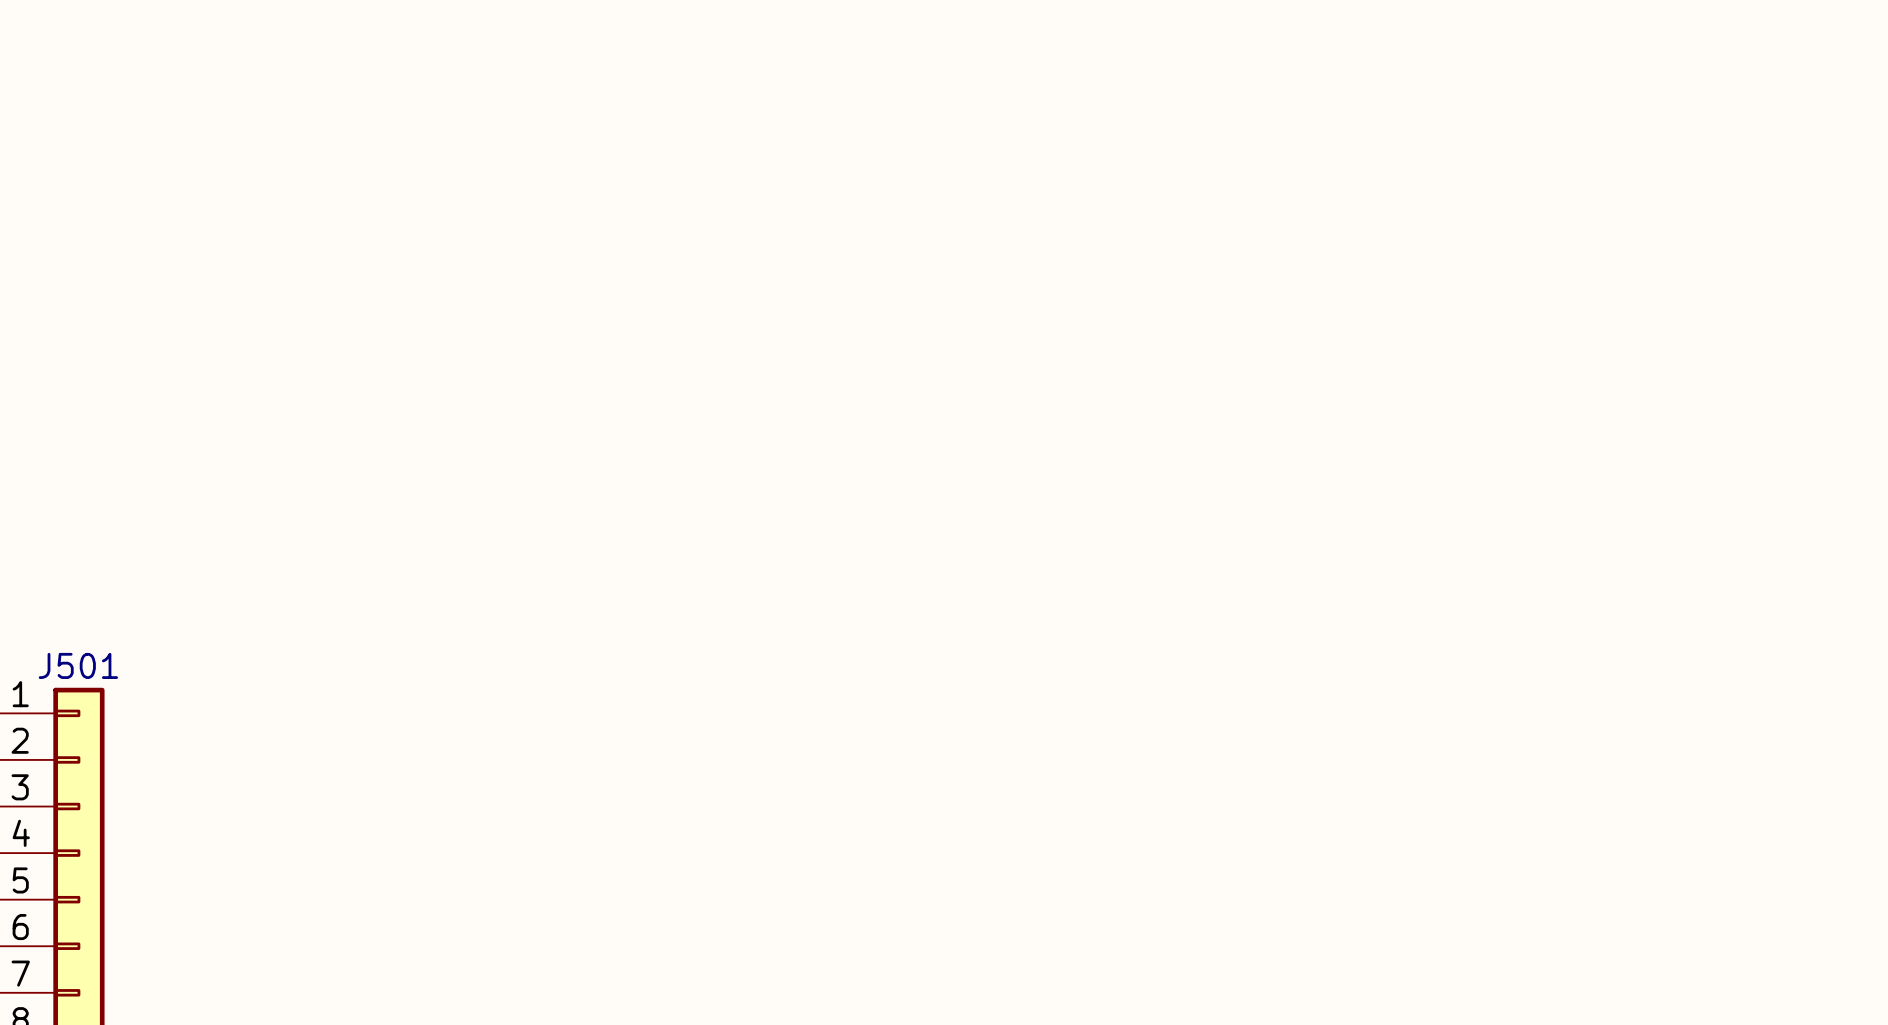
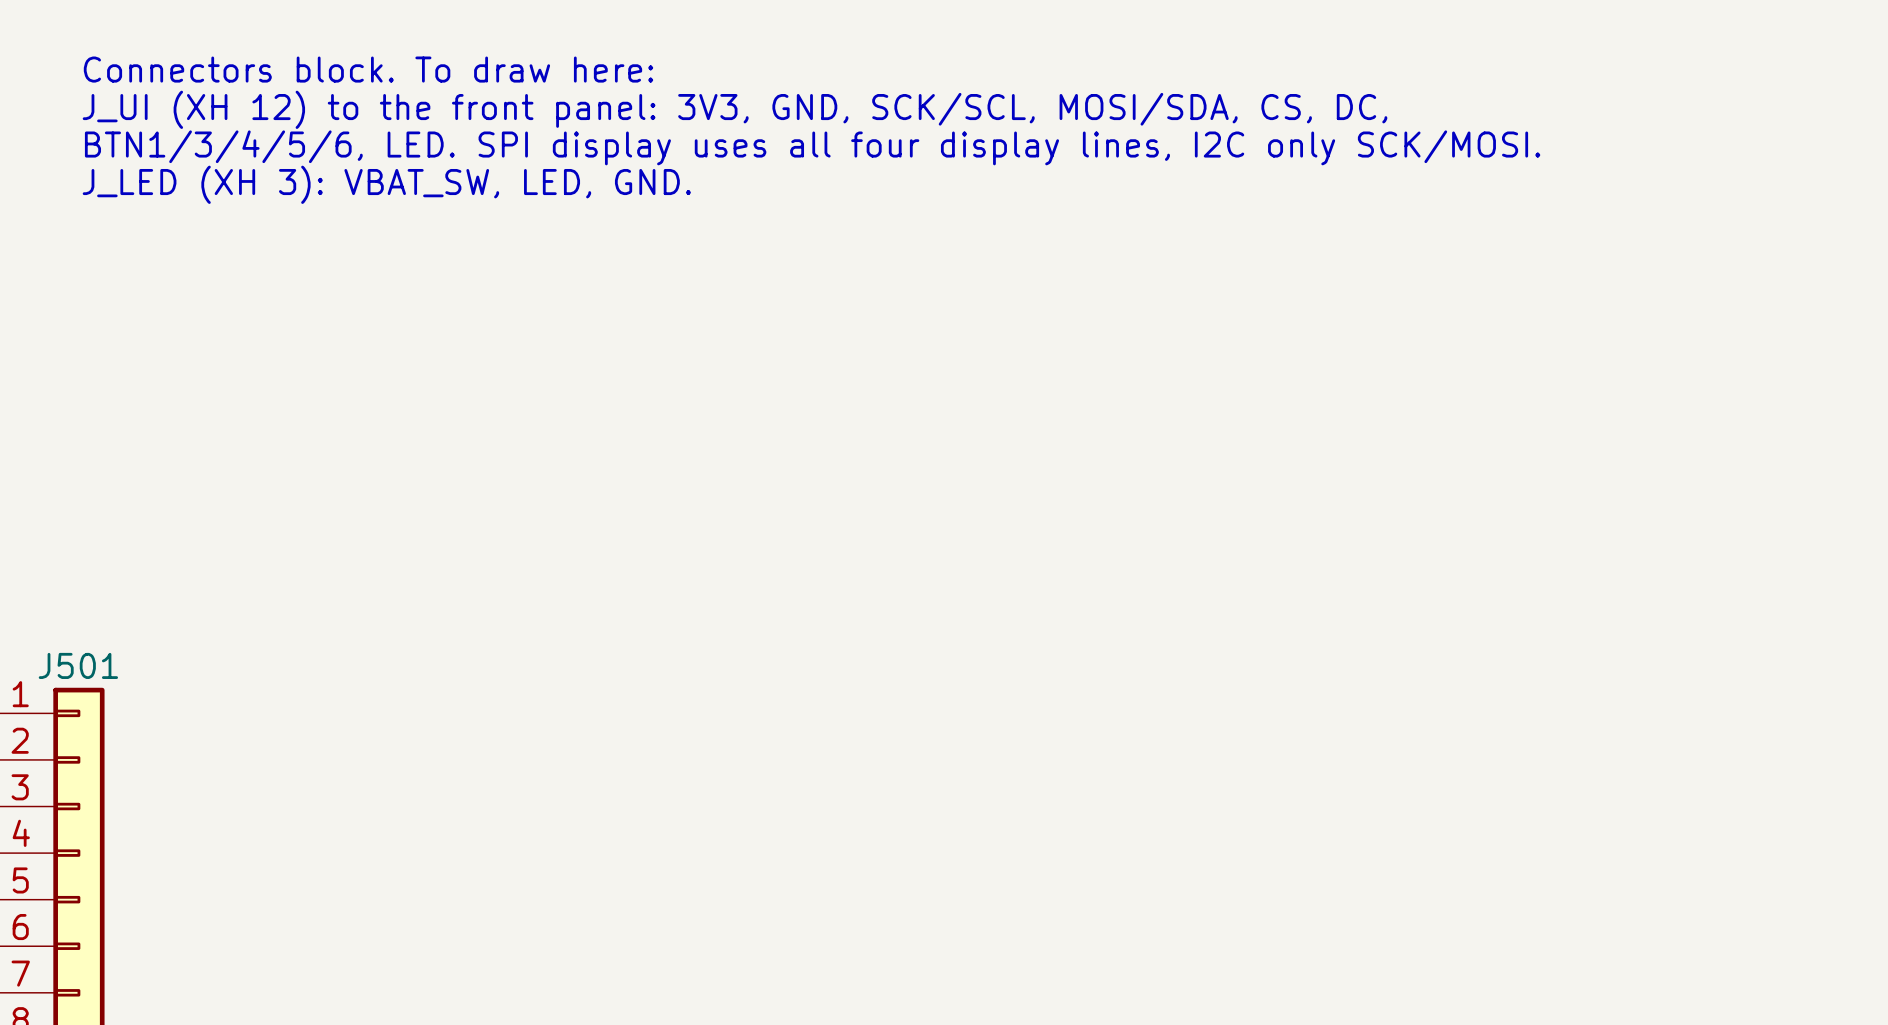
text: none -> Connectors block. To draw here: (368, 69)
text: none -> J_UI (XH 12) to the front panel: 3V3, GND, SCK/SCL, MOSI/SDA, CS, DC, (734, 109)
text: none -> BTN1/3/4/5/6, LED. SPI display uses all four display lines, I2C only SCK/MOSI. (812, 147)
text: none -> J_LED (XH 3): VBAT_SW, LED, GND. (386, 184)

